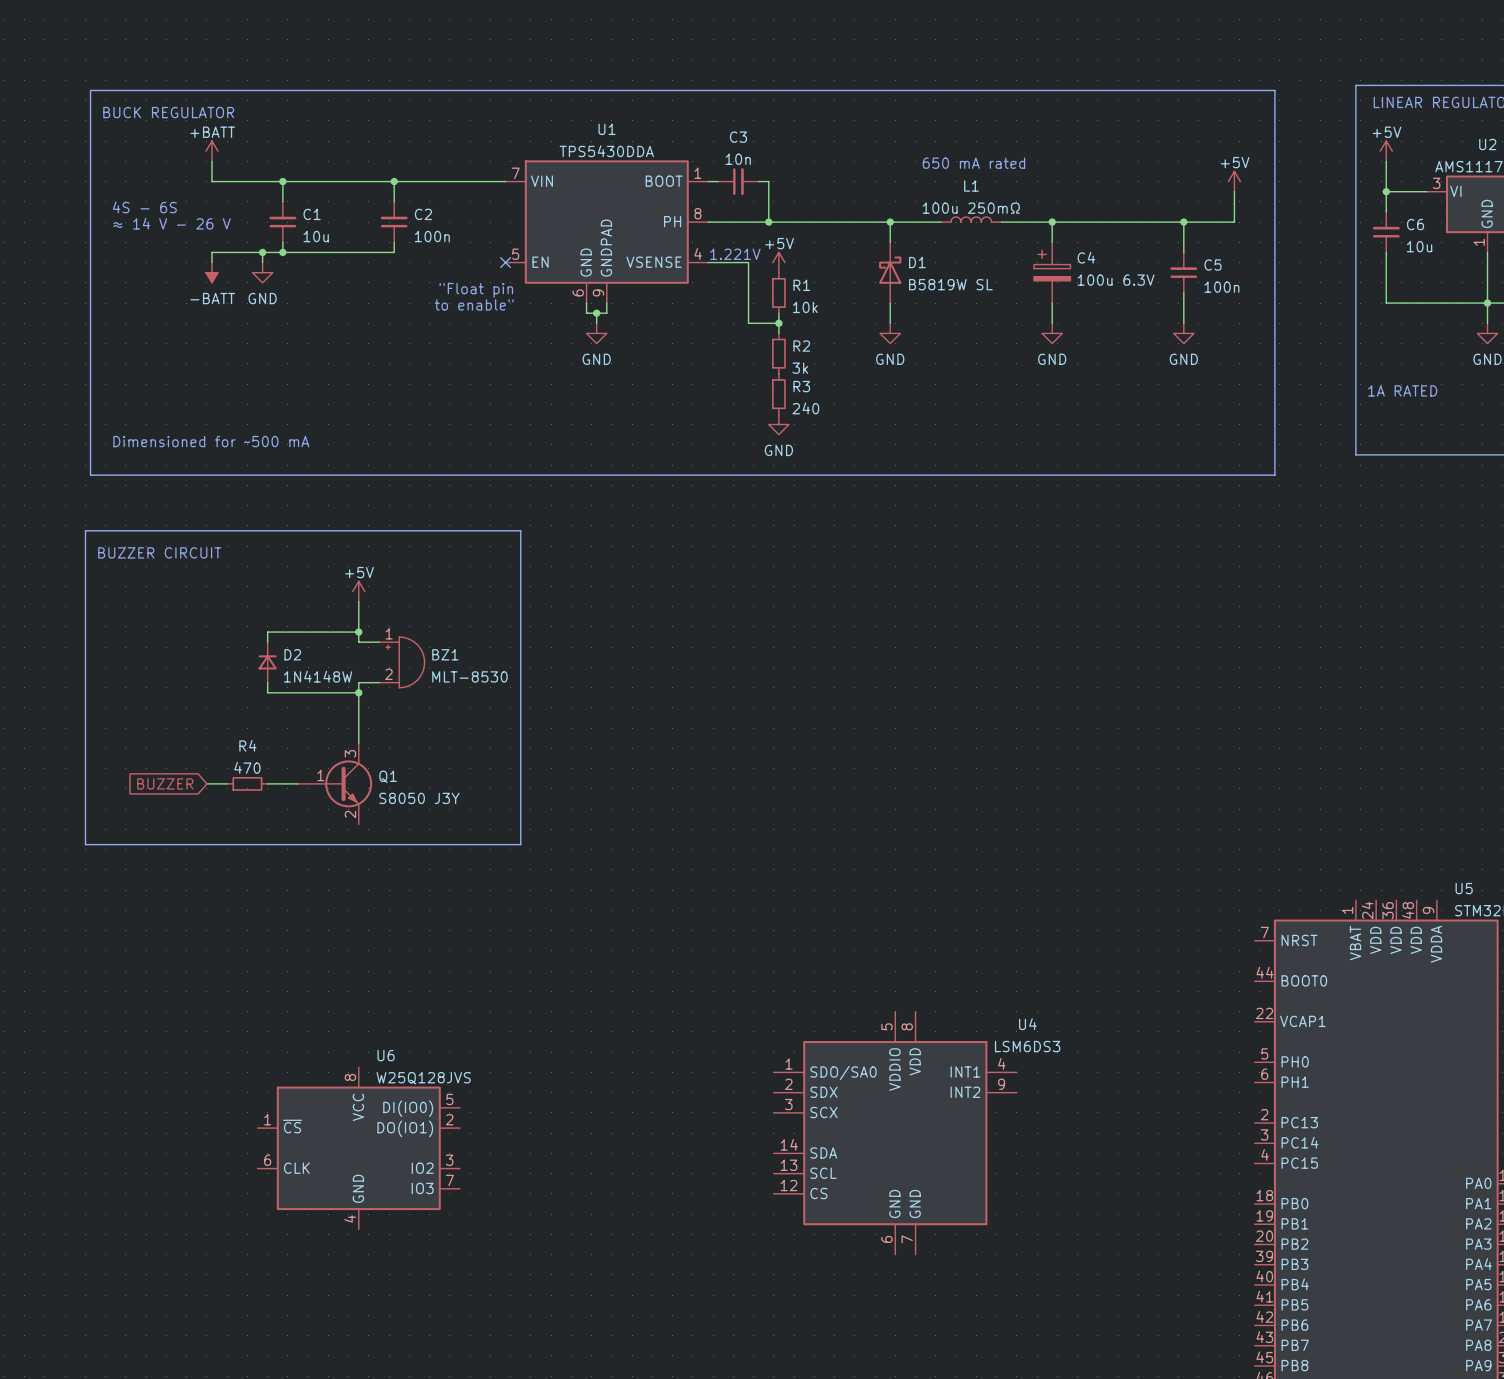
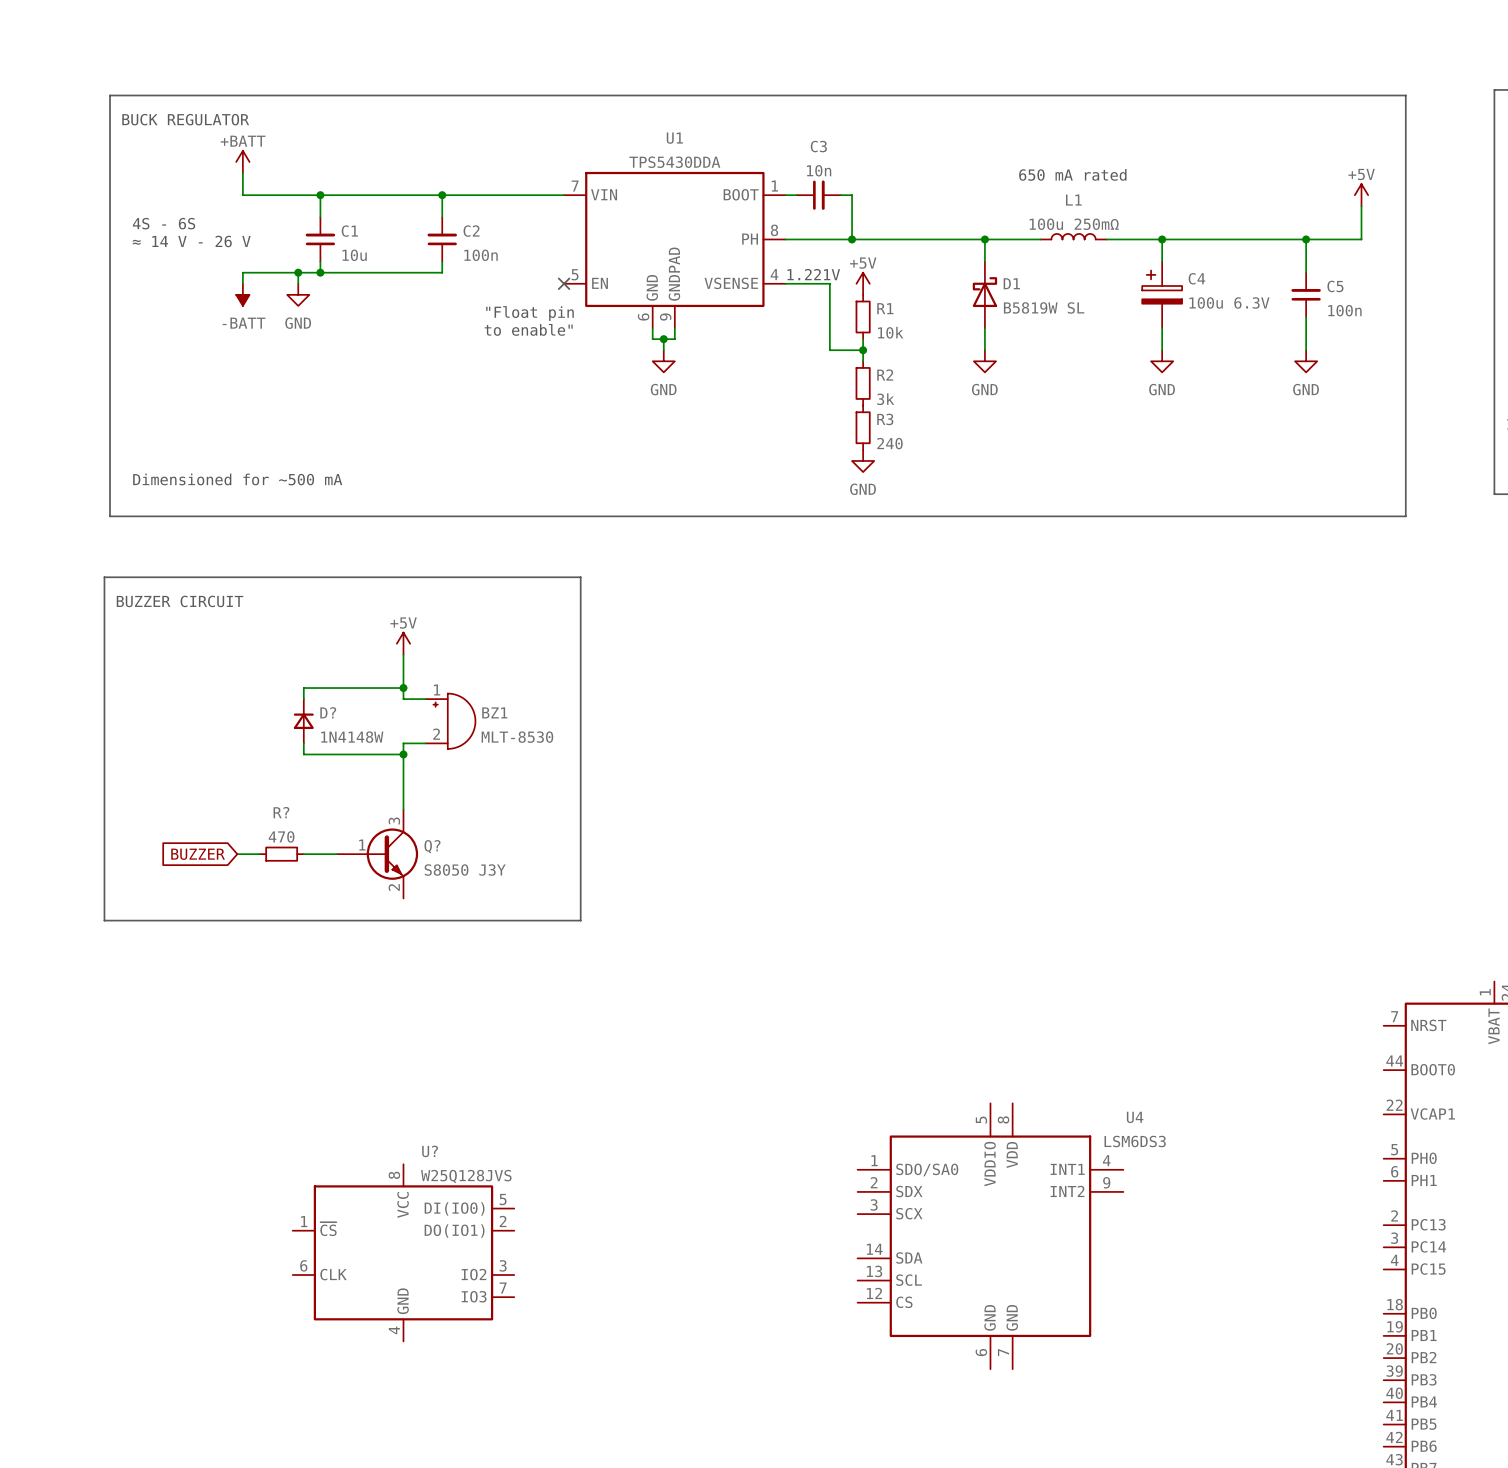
D2 name: D2 (292, 654) -> D? (328, 712)
R4 name: R4 (247, 745) -> R? (281, 812)
Q1 name: Q1 (388, 776) -> Q? (432, 846)
U6 name: U6 (386, 1055) -> U? (430, 1151)

